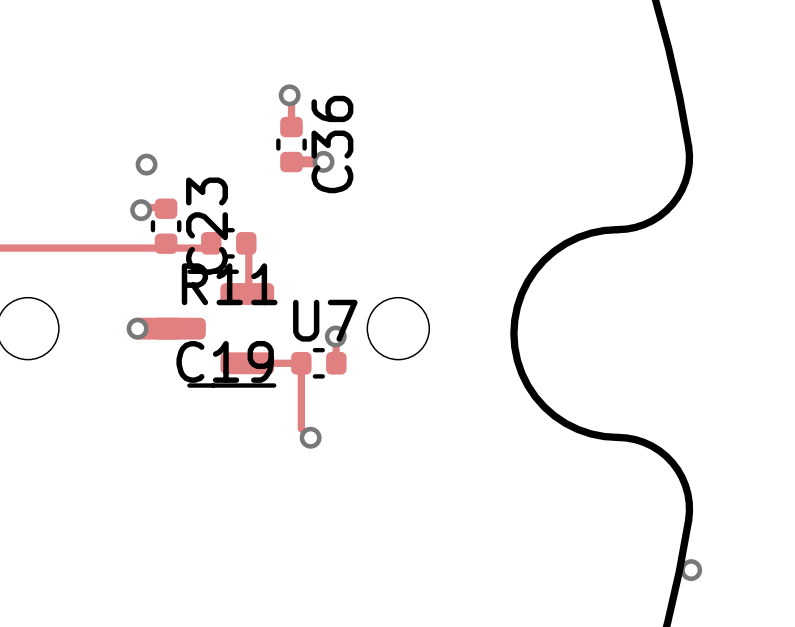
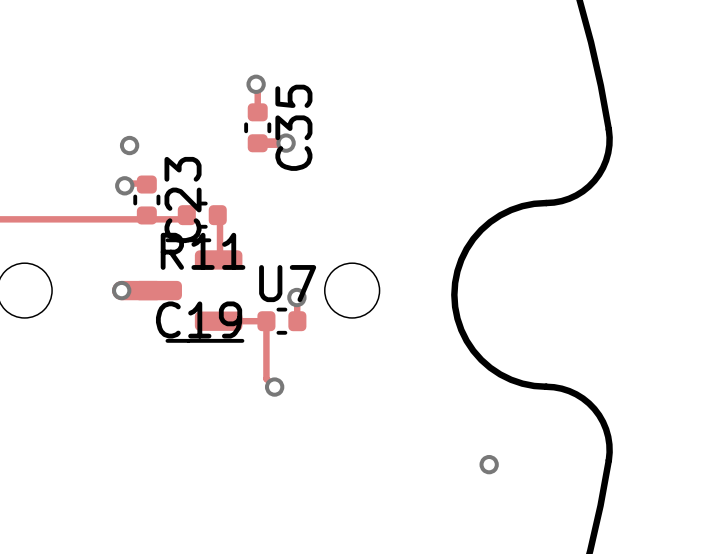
C36 name: C36 (332, 144) -> C35 (293, 127)
via: none -> (489, 464)
via: (691, 570) -> none

